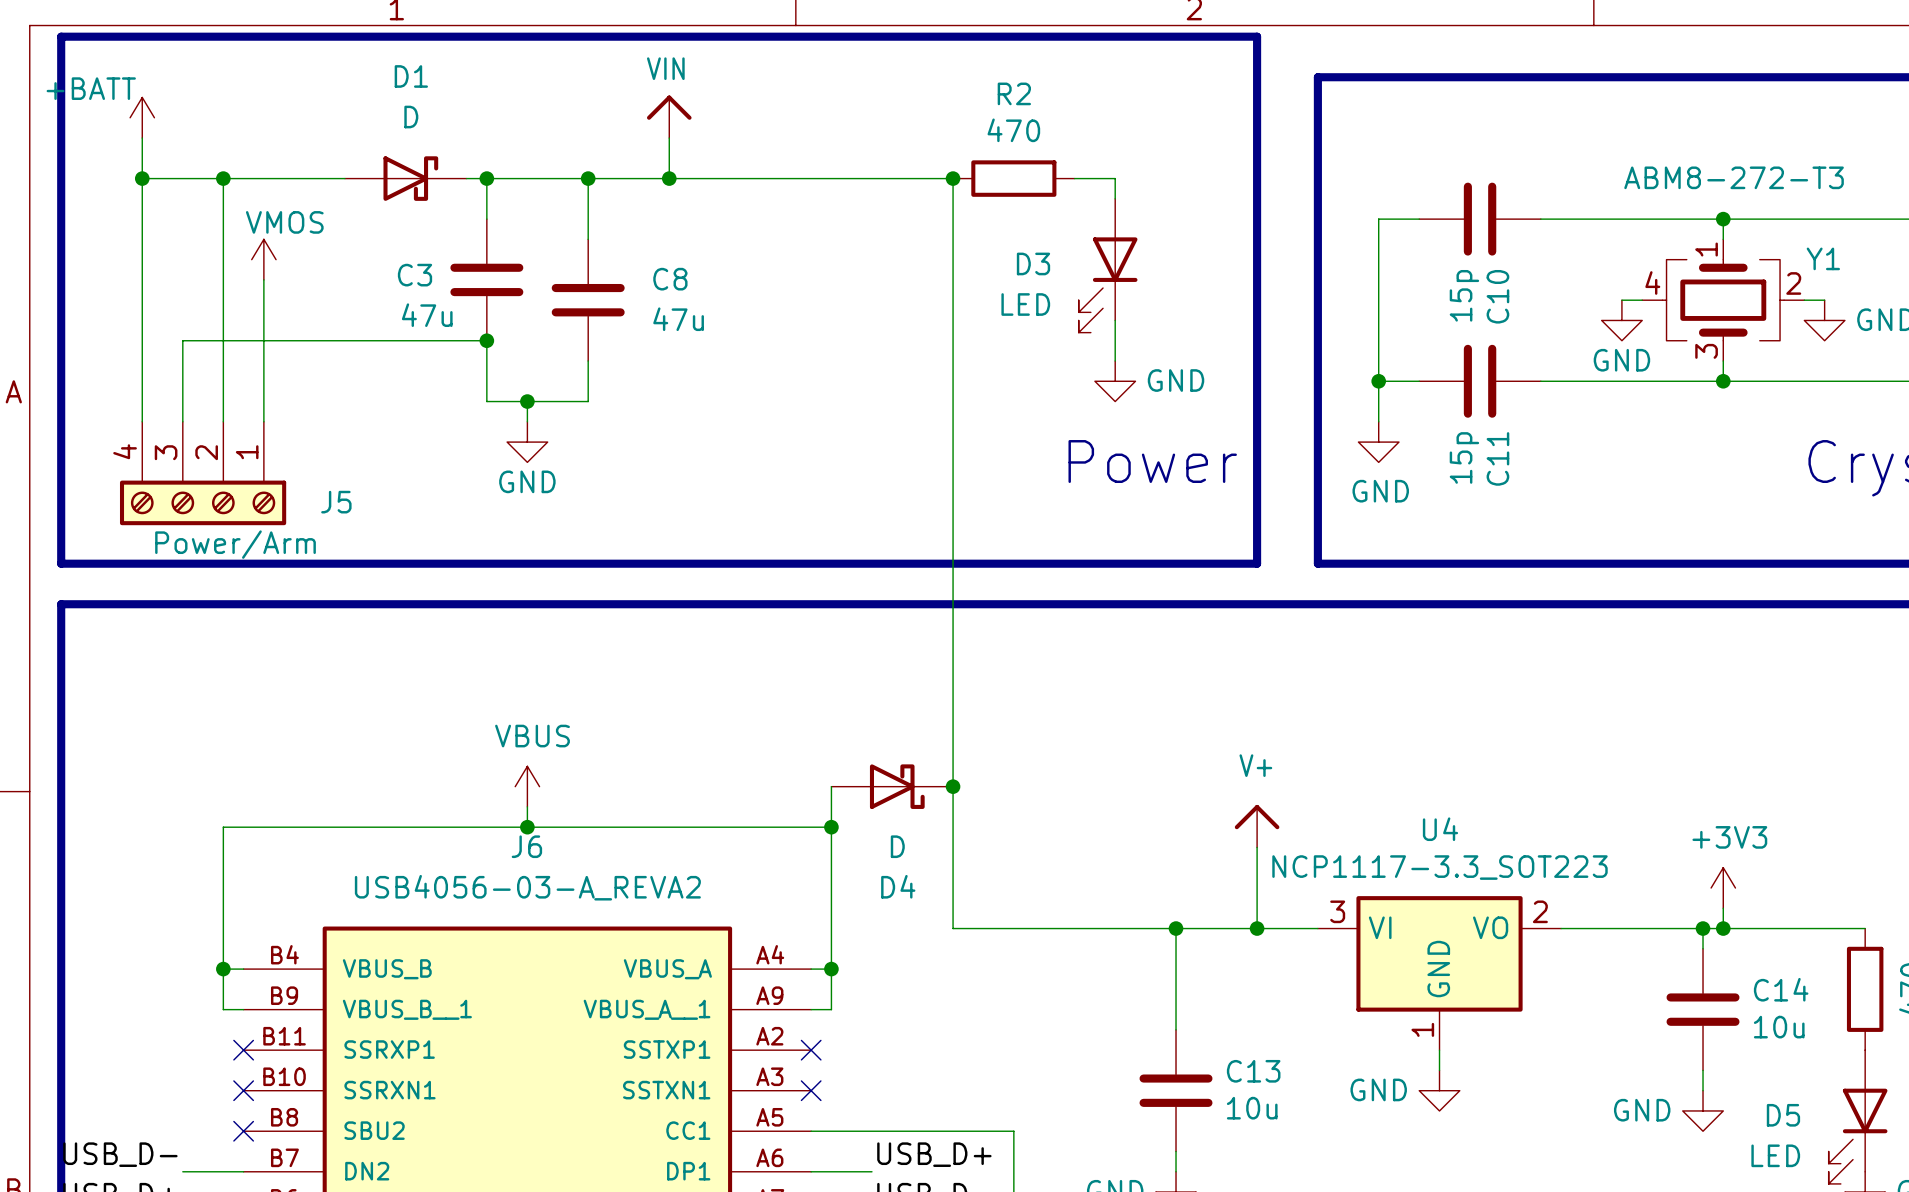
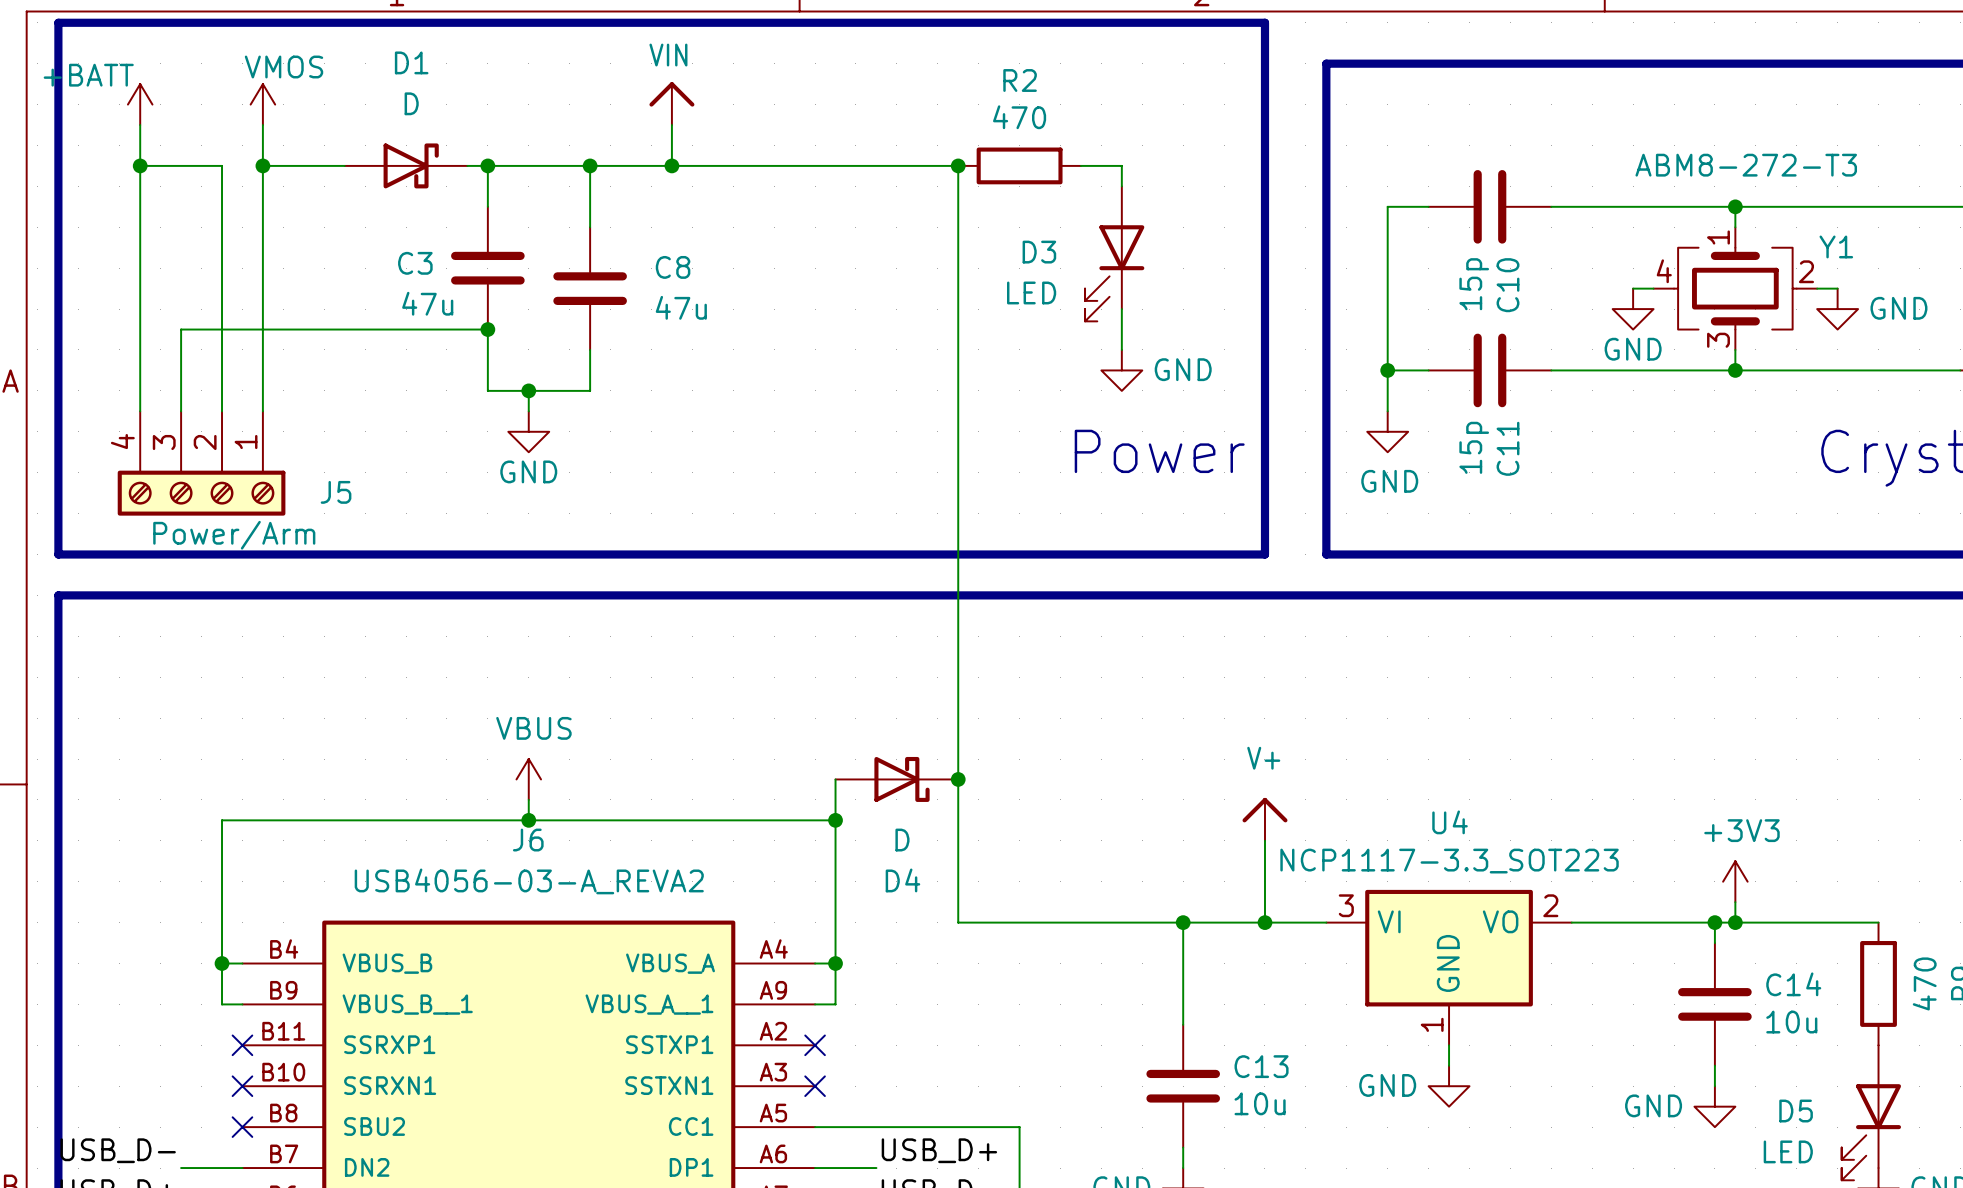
wire: none -> (262, 125) (262, 268)
wire: (223, 178) (263, 178) -> none
junction position: (223, 178) -> (262, 165)
power symbol position: VMOS (263, 259) -> VMOS (262, 104)

